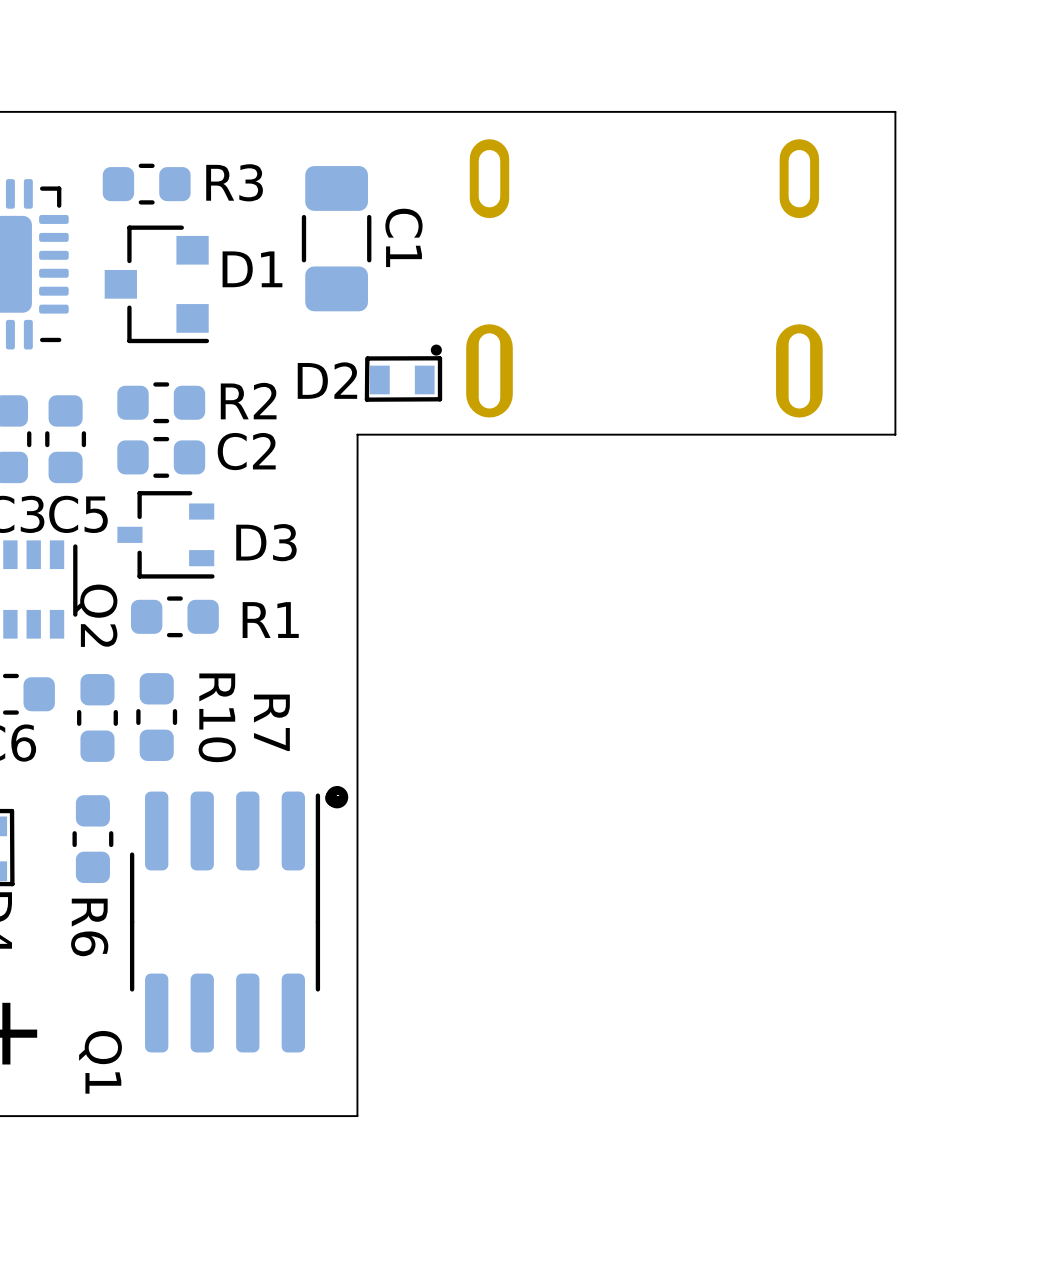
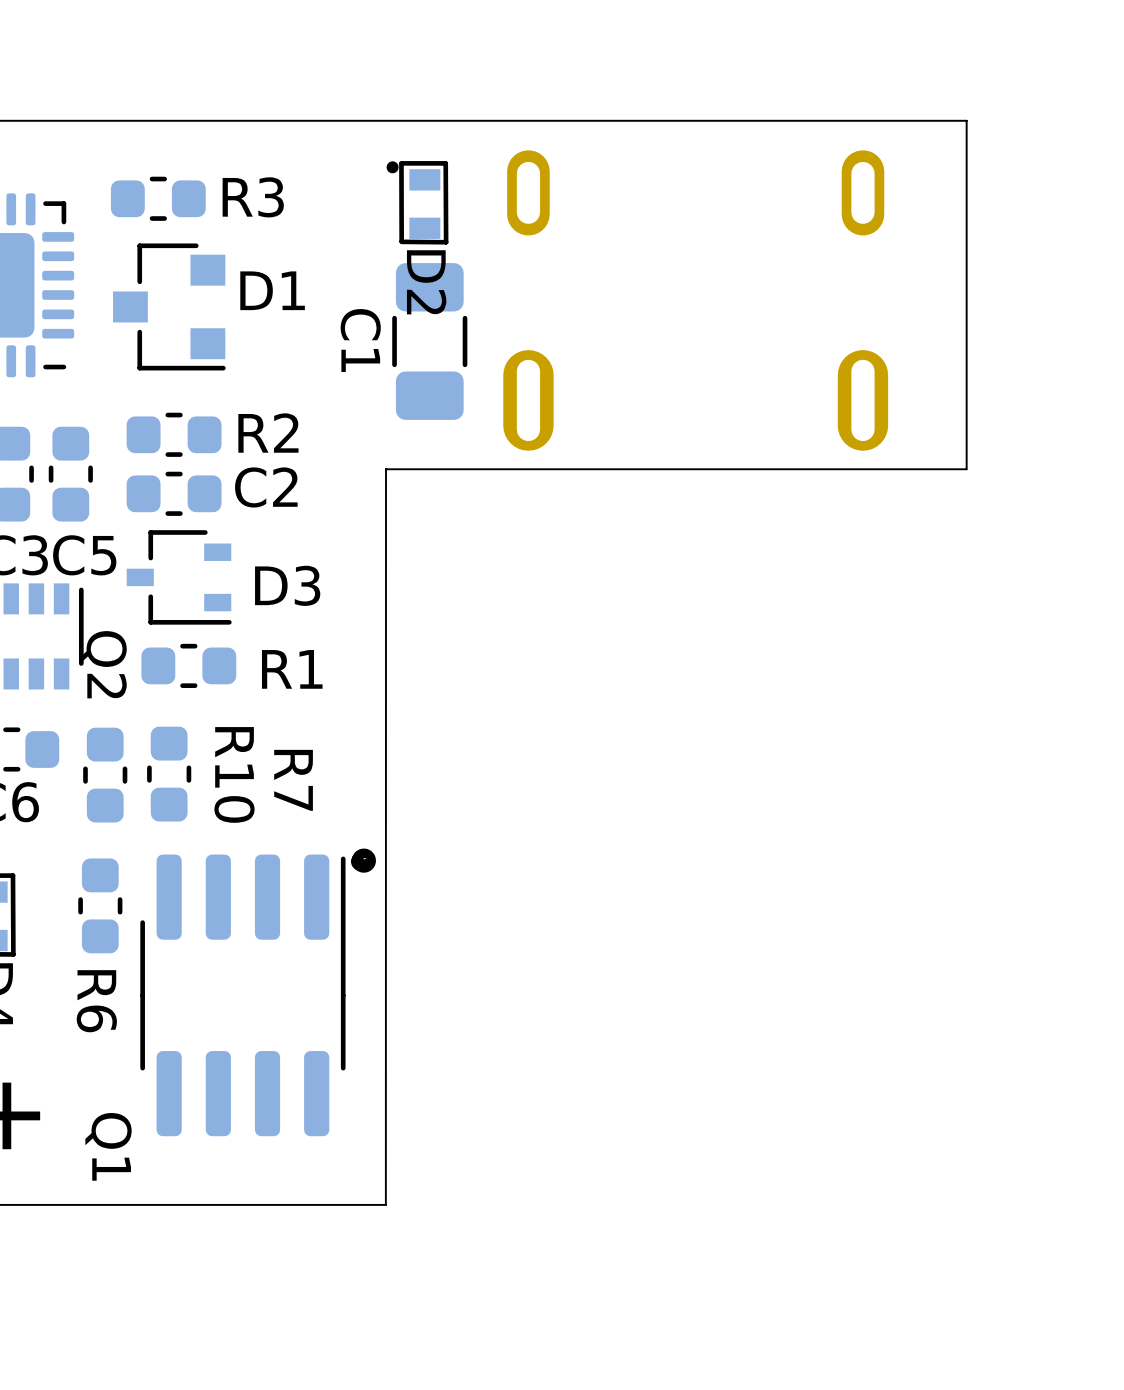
C1 name position: C1 (403, 237) -> C1 (360, 340)
C1 position: (336, 238) -> (429, 341)
D2 rotation: 0° (403, 373) -> 90° counterclockwise (417, 202)
D2 position: (403, 373) -> (417, 202)

